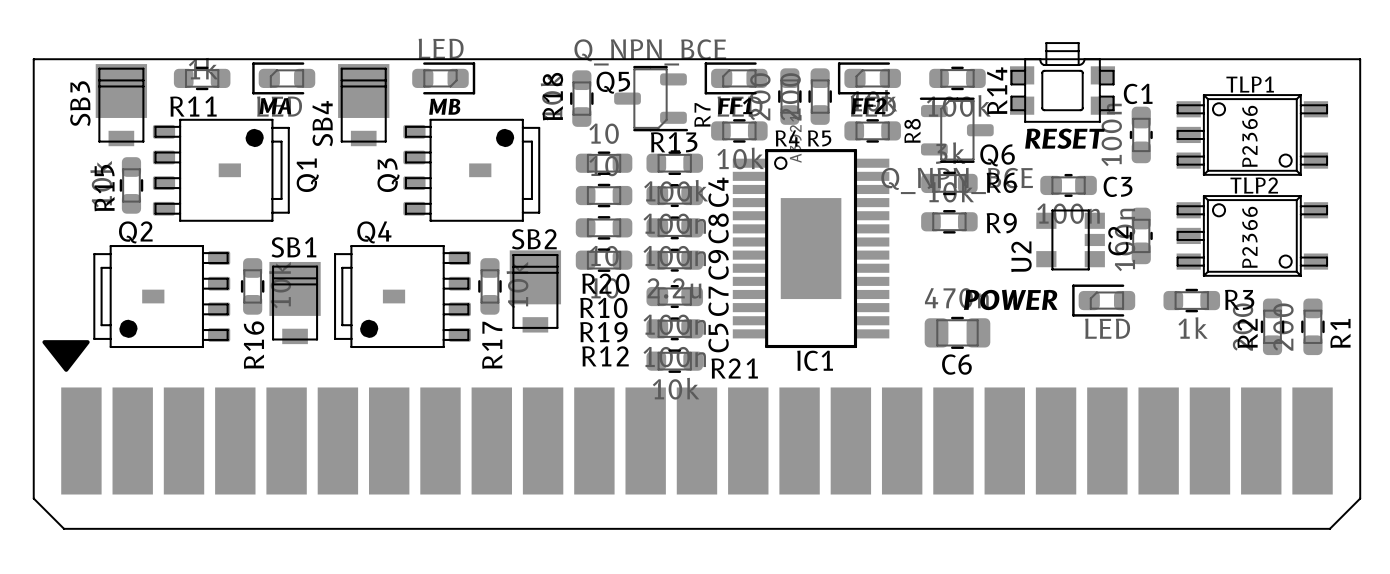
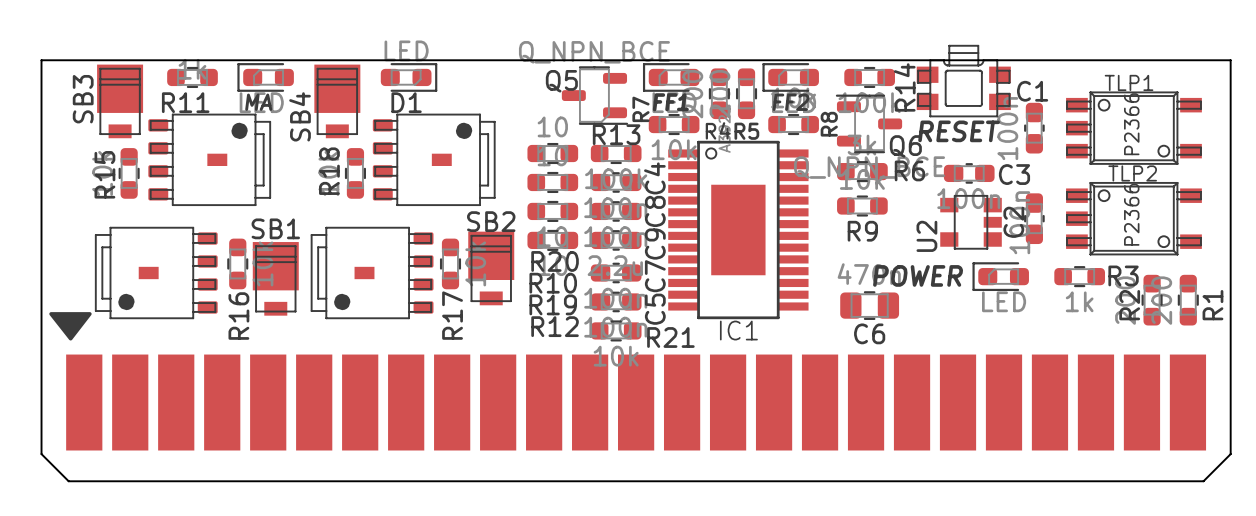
R18 position: (581, 98) -> (355, 173)
MB name: MB (444, 106) -> D1 (406, 102)
Q1 name: Q1 (307, 175) -> none
Q3 name: Q3 (388, 175) -> none
R9 name position: R9 (1001, 223) -> R9 (862, 231)
Q2 name: Q2 (135, 232) -> none
Q4 name: Q4 (374, 232) -> none

